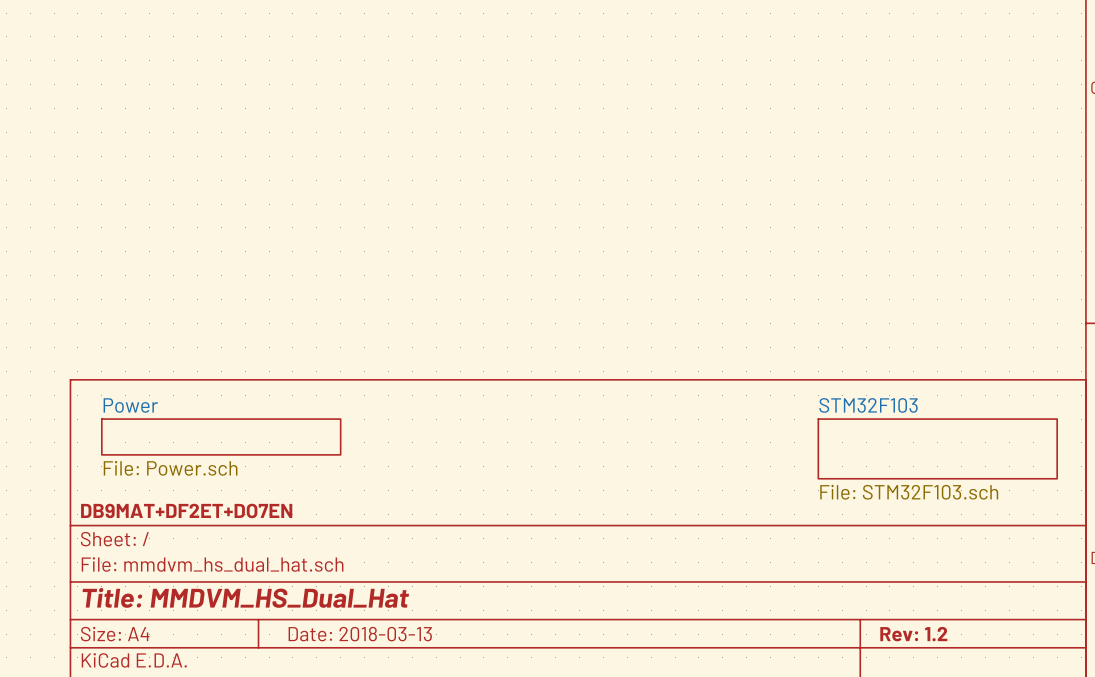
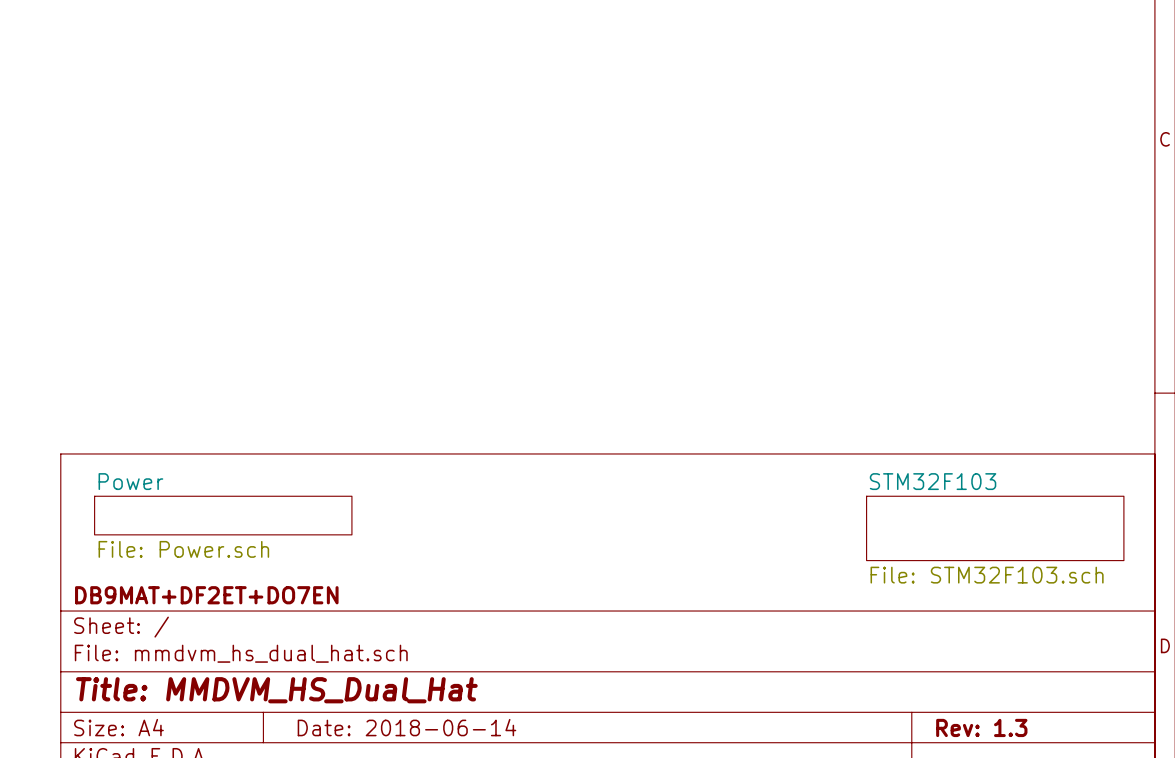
title block: Date: 2018-03-13 (360, 634) -> Date: 2018-06-14 (406, 727)
title block: Rev: 1.2 (913, 634) -> Rev: 1.3 (981, 727)

